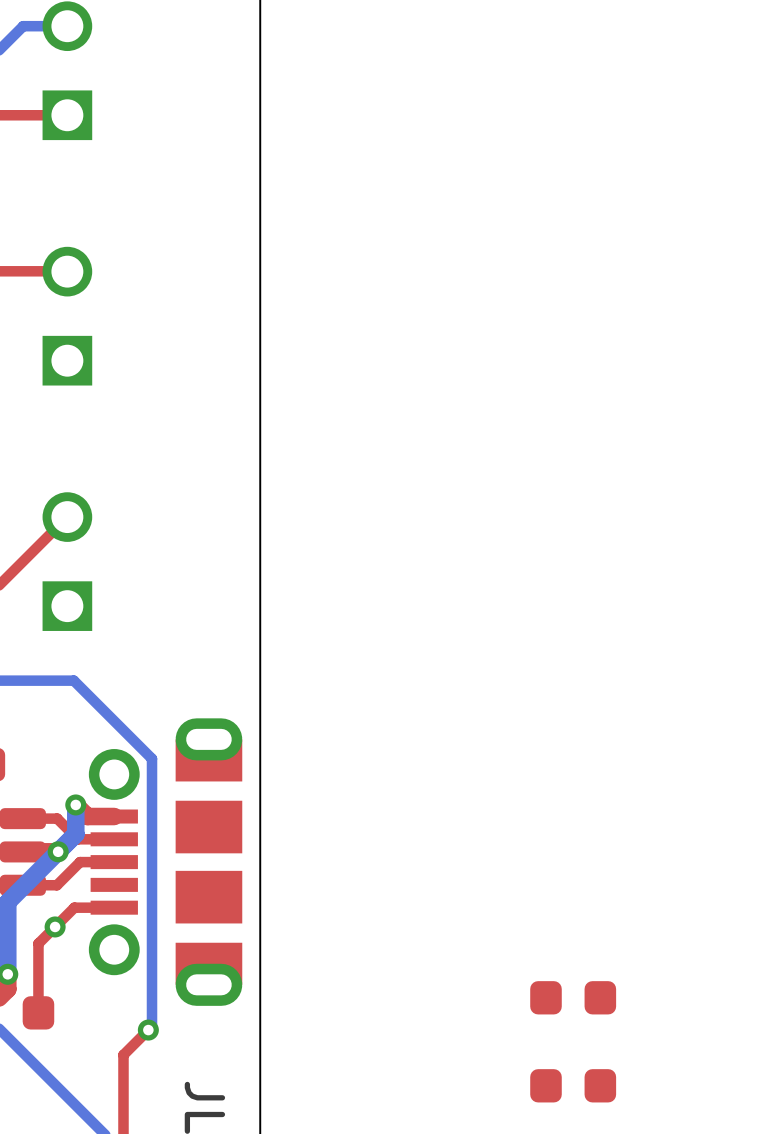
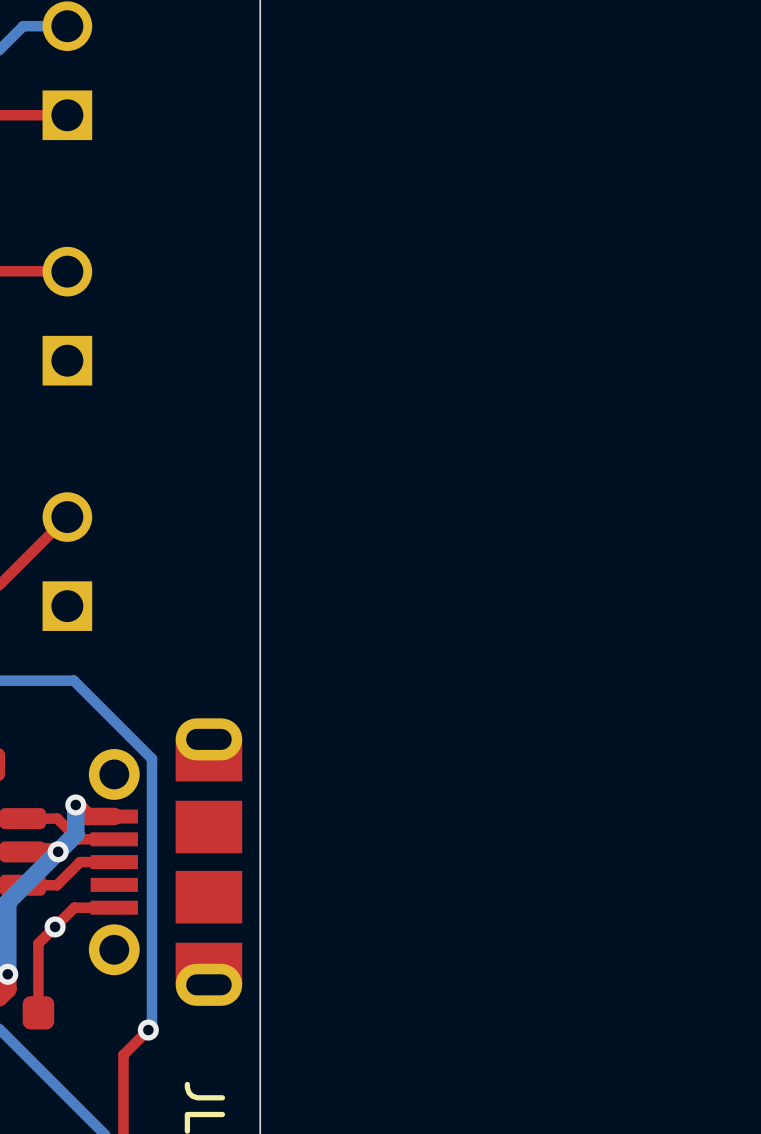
part: (573, 997) -> none
part: (573, 1085) -> none

